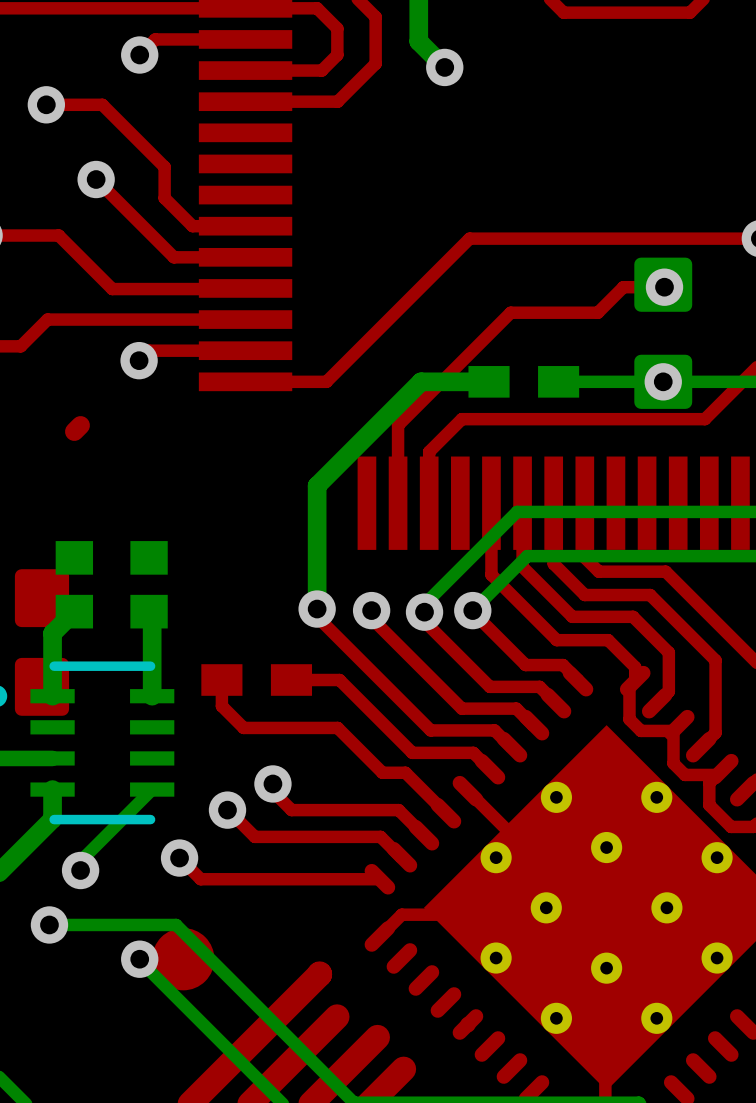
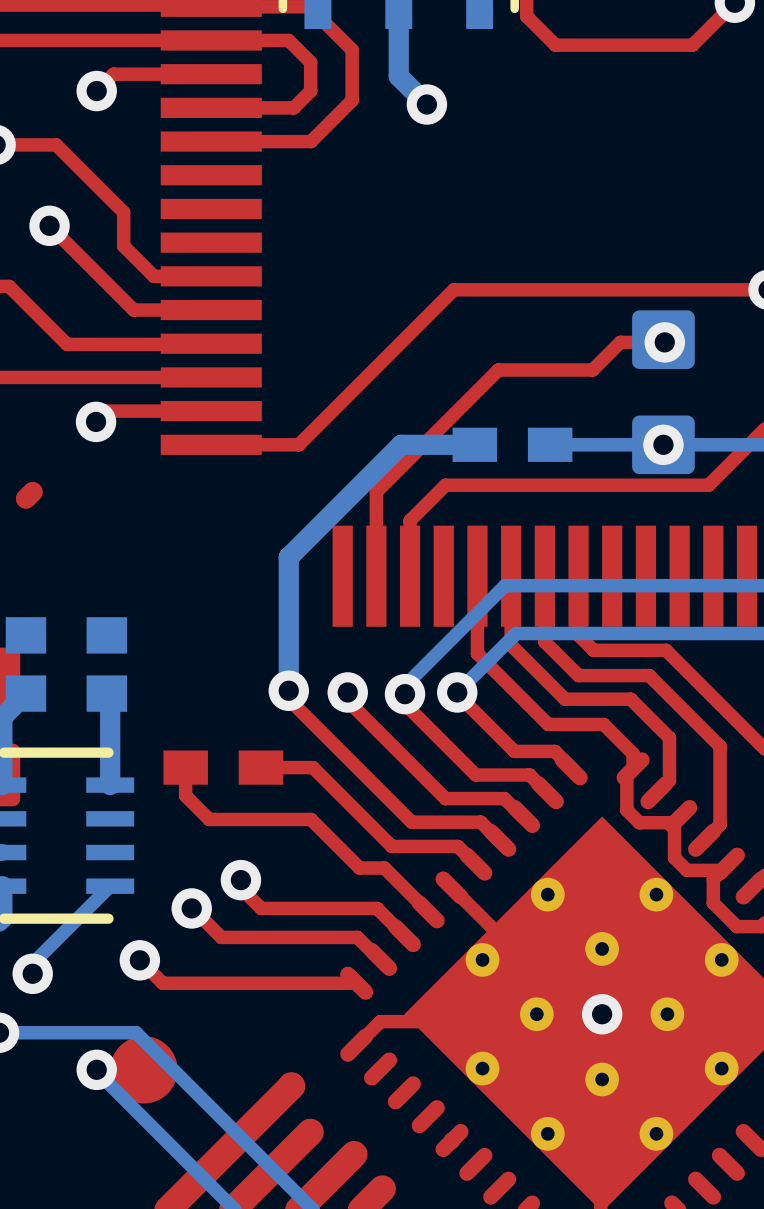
via: none -> (602, 1014)

